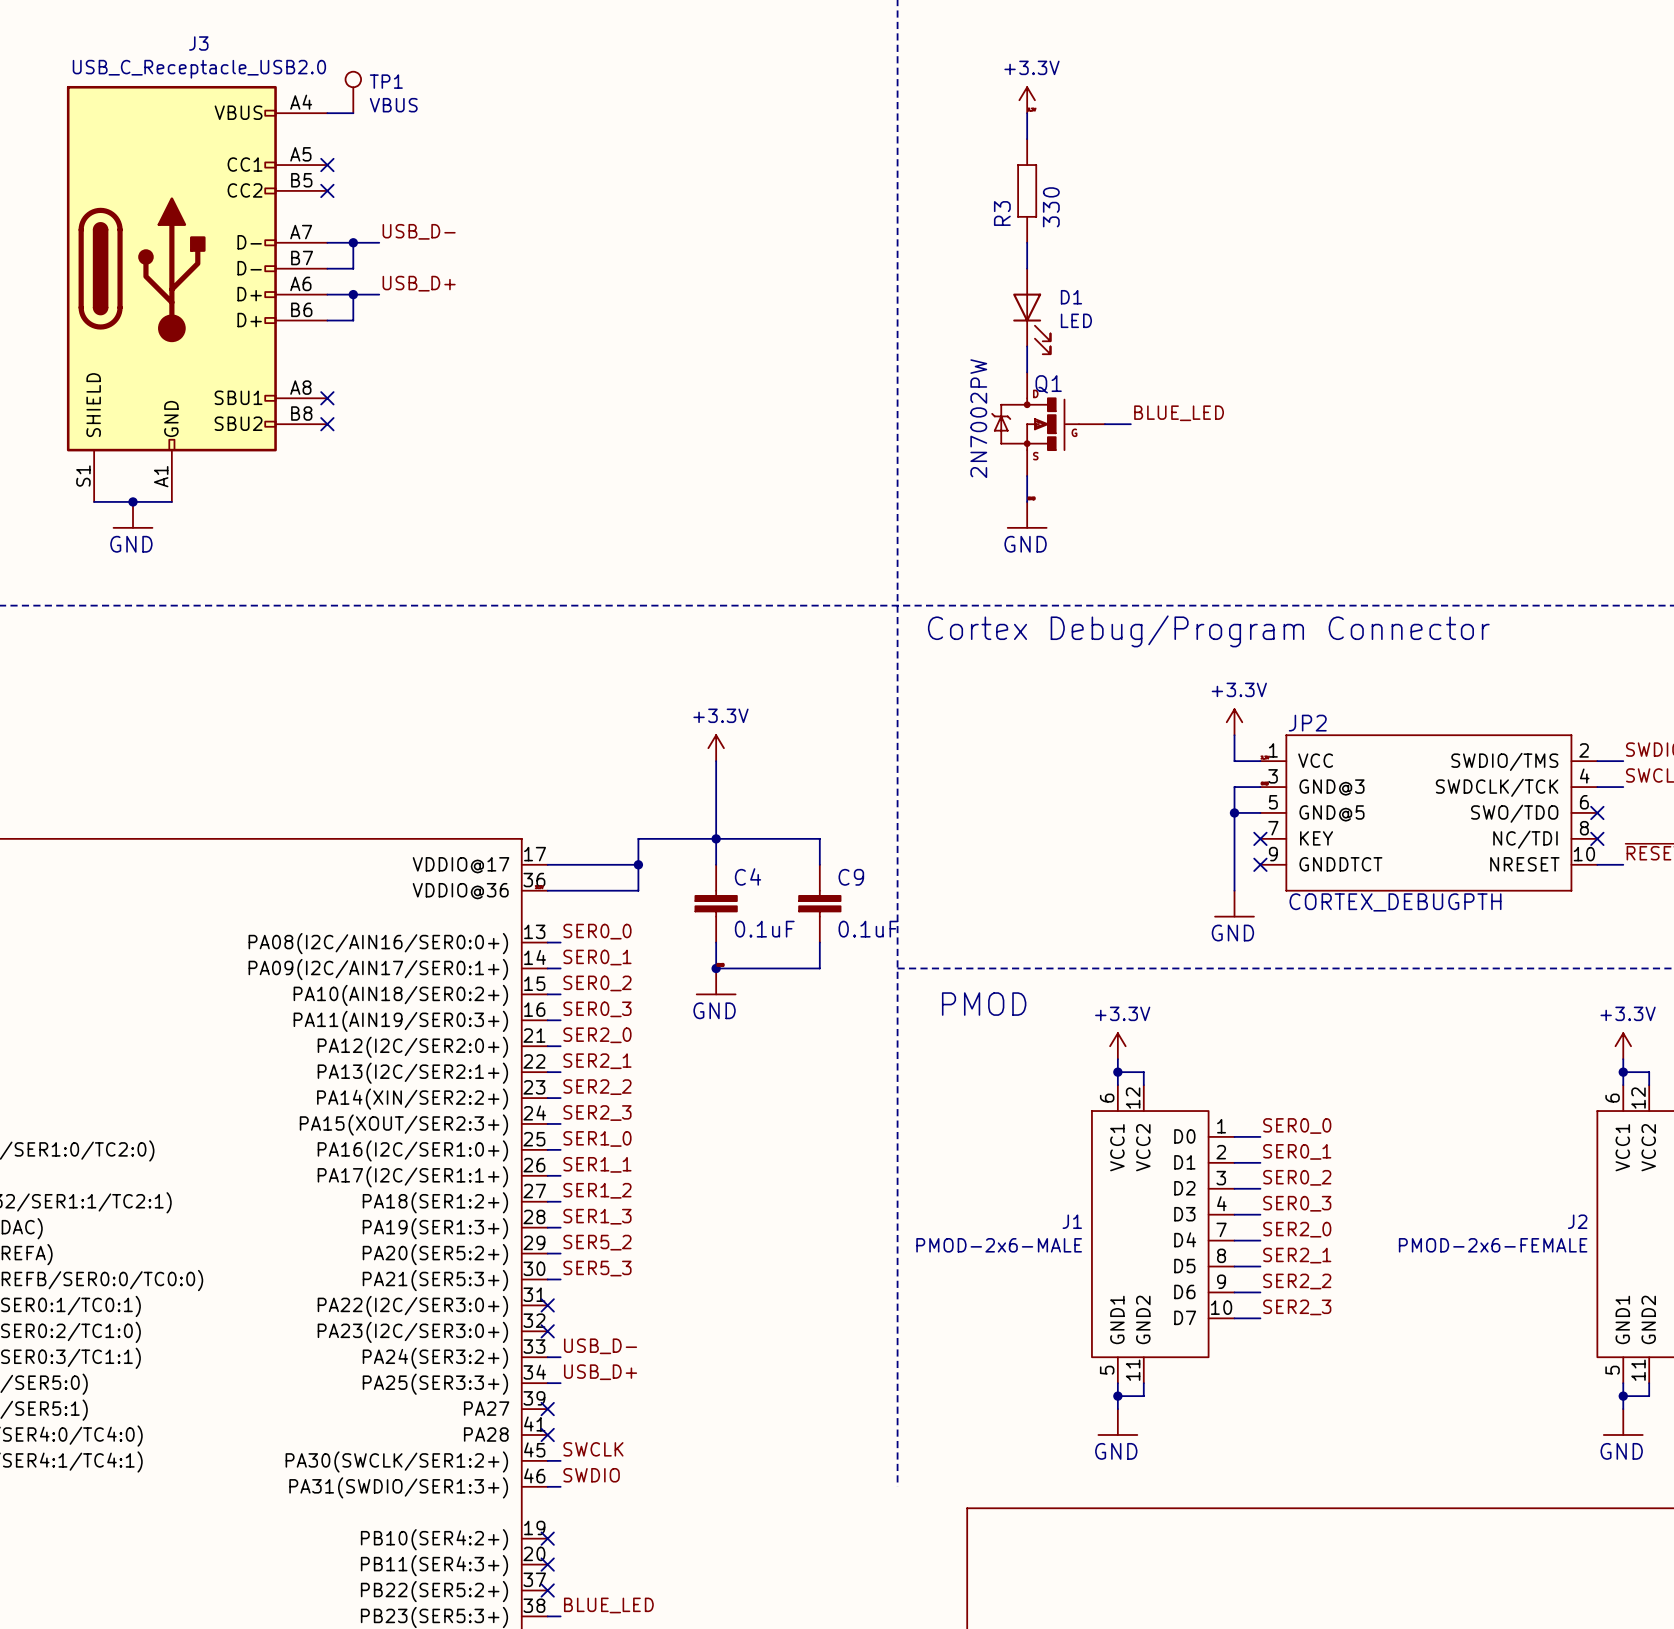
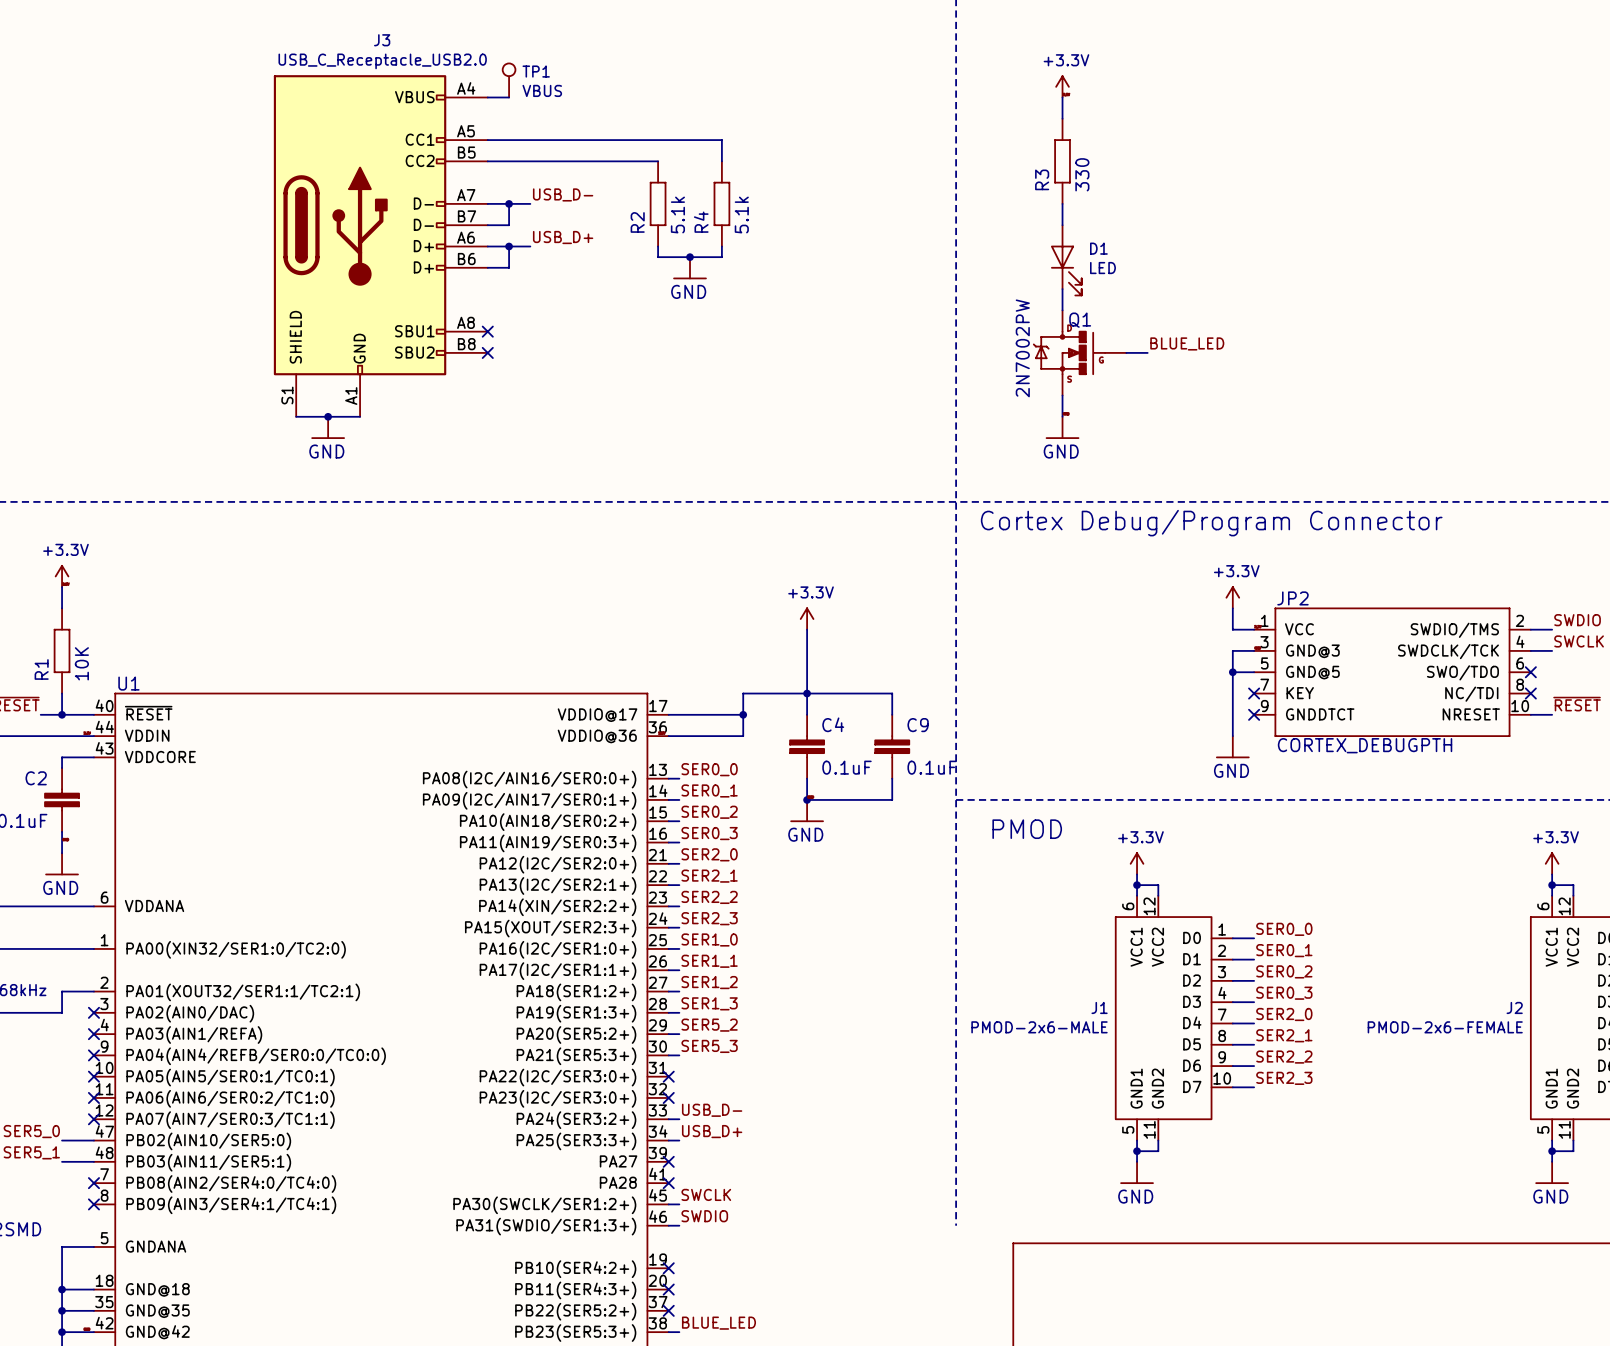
wire: none -> (487, 140) (721, 140) (721, 161)
no-connect mark: (327, 165) -> none
wire: none -> (487, 161) (658, 161)
no-connect mark: (327, 190) -> none
R2: none -> 5.1k (658, 203)
R4: none -> 5.1k (721, 203)
wire: none -> (658, 246) (658, 257) (721, 257) (721, 246)
junction: none -> (690, 257)
power symbol: none -> GND (690, 267)

